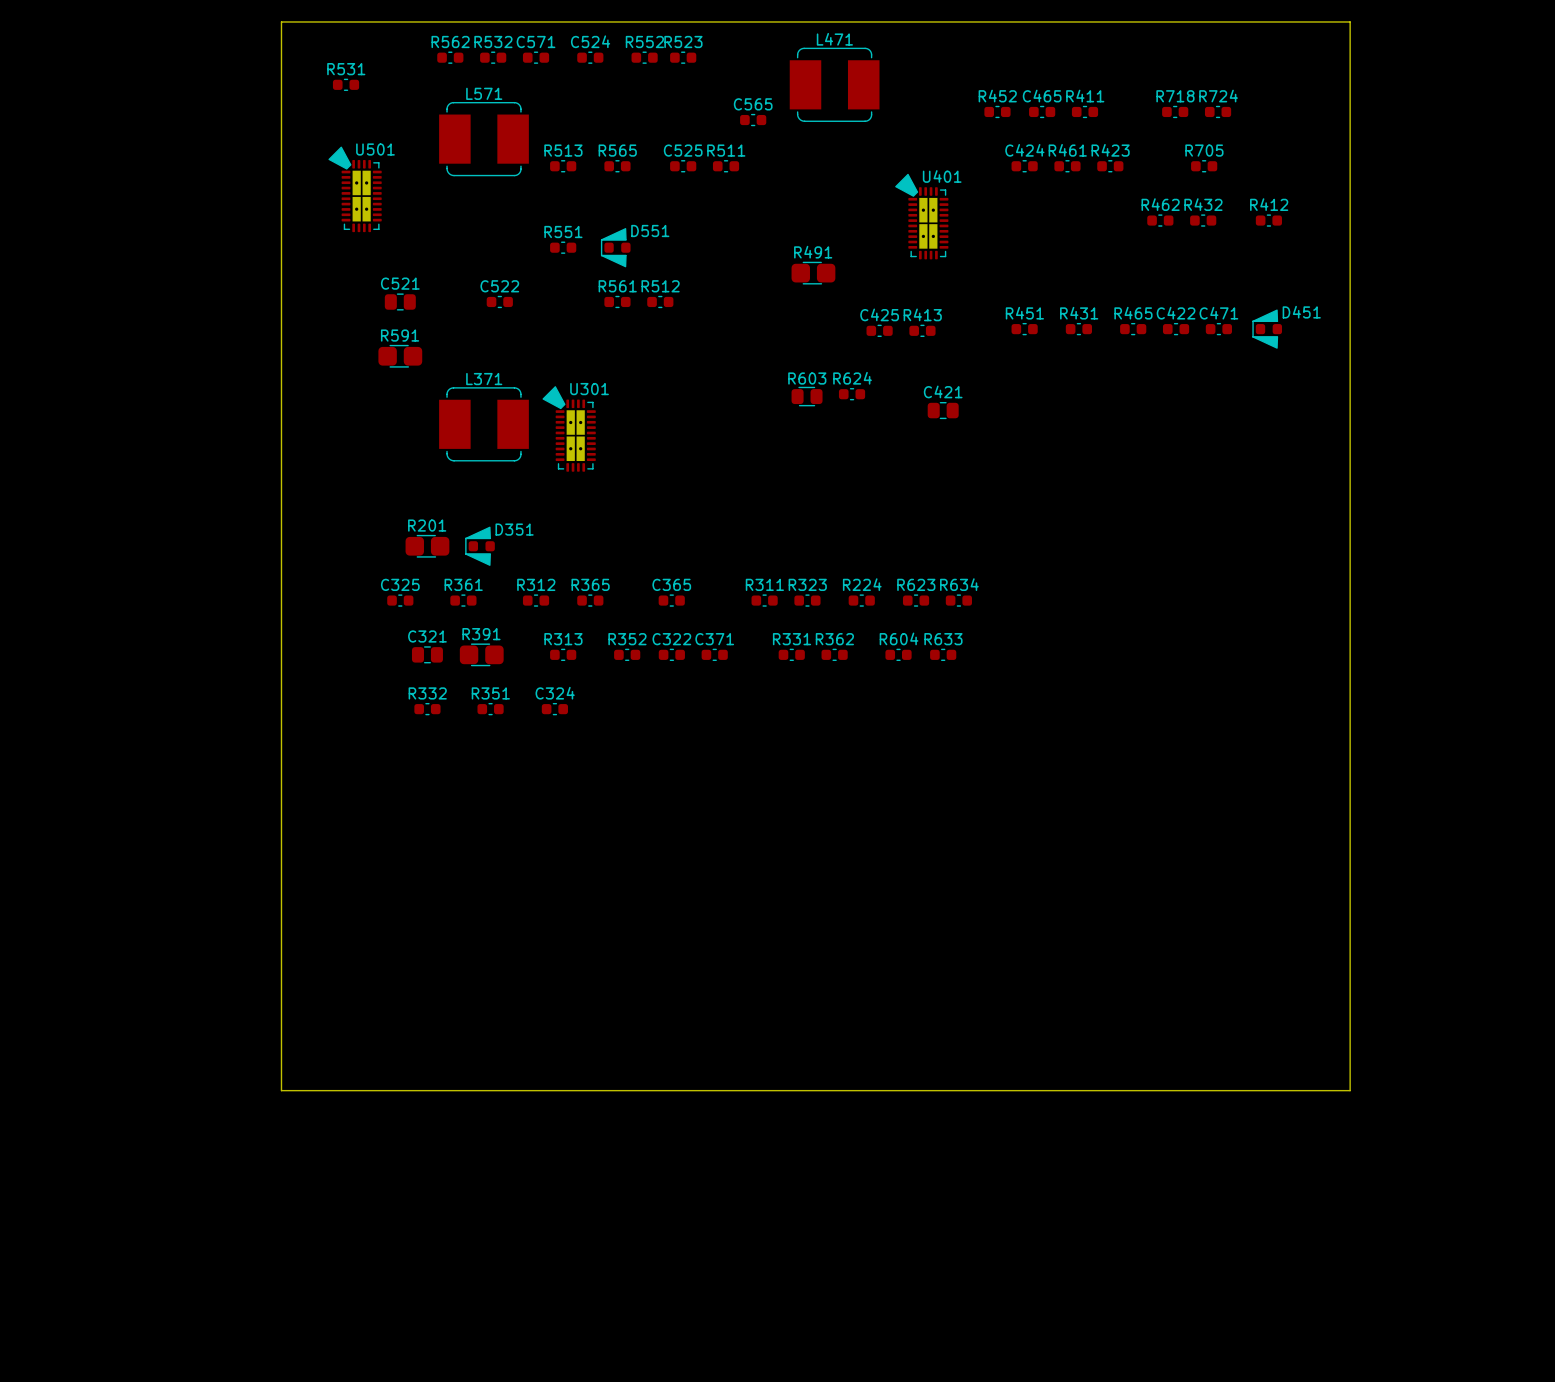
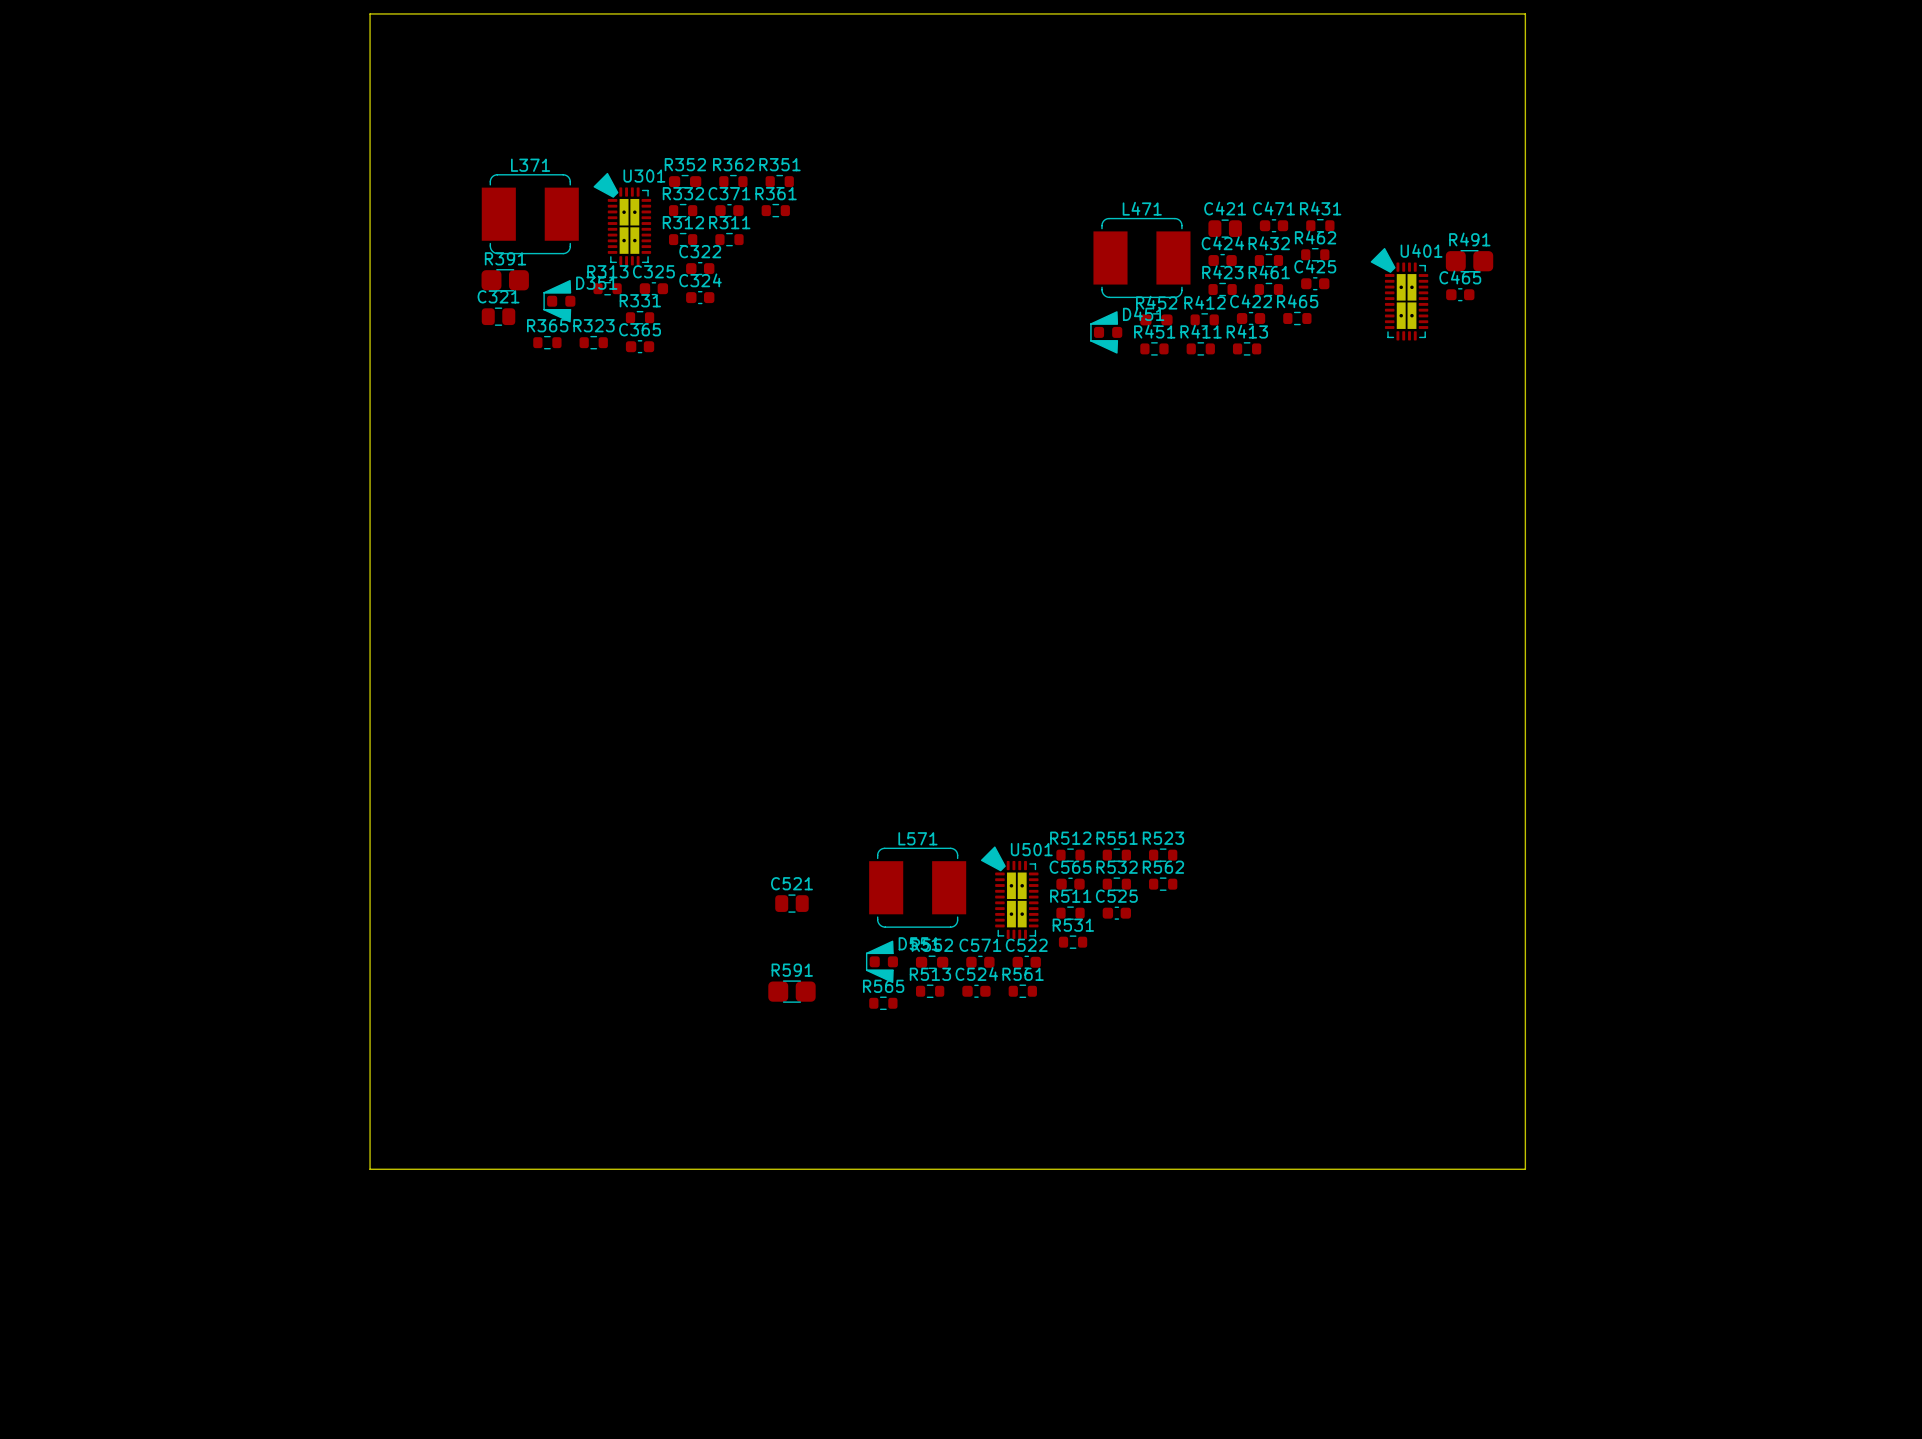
R562 footprint: [437, 51, 464, 64] -> [1149, 877, 1178, 891]
R532 footprint: [480, 51, 507, 64] -> [1102, 877, 1132, 891]
R552 footprint: [631, 51, 658, 64] -> [915, 955, 949, 969]
R523 footprint: [670, 51, 697, 64] -> [1149, 848, 1178, 862]
C571 position: (536, 57) -> (980, 962)
C524 position: (590, 57) -> (976, 991)
R531 footprint: [332, 78, 360, 91] -> [1058, 935, 1088, 949]
L471 position: (834, 84) -> (1141, 257)
R452 footprint: [984, 105, 1011, 119] -> [1140, 313, 1173, 327]
R411 footprint: [1071, 105, 1099, 119] -> [1186, 342, 1215, 356]
C465 position: (1042, 111) -> (1460, 294)
R718: (1175, 111) -> none
R724: (1218, 111) -> none
C565 position: (753, 120) -> (1070, 884)
L571 position: (483, 139) -> (917, 887)
R513 footprint: [550, 160, 577, 173] -> [915, 984, 945, 998]
R565 footprint: [604, 160, 631, 173] -> [869, 996, 898, 1011]
R511 footprint: [712, 160, 740, 173] -> [1056, 906, 1085, 920]
R461 footprint: [1054, 160, 1081, 173] -> [1254, 282, 1284, 297]
R423 footprint: [1097, 160, 1124, 173] -> [1208, 282, 1237, 297]
C525 position: (683, 166) -> (1116, 913)
C424 position: (1024, 166) -> (1222, 260)
R705: (1204, 166) -> none
U501 position: (355, 189) -> (1009, 892)
R462 footprint: [1147, 214, 1174, 227] -> [1301, 248, 1330, 262]
R432 footprint: [1190, 214, 1217, 227] -> [1254, 253, 1284, 268]
R412 footprint: [1255, 214, 1283, 227] -> [1190, 313, 1219, 327]
U401 position: (921, 216) -> (1399, 294)
R551 footprint: [550, 241, 577, 254] -> [1102, 848, 1132, 862]
D551 position: (615, 247) -> (881, 961)
R491 footprint: [791, 261, 836, 285] -> [1445, 250, 1494, 273]
C521 name: C521 (400, 283) -> C321 (498, 296)
R561 footprint: [604, 295, 631, 309] -> [1008, 984, 1037, 998]
R512 footprint: [647, 295, 674, 309] -> [1056, 848, 1085, 862]
C522 position: (499, 301) -> (1026, 962)
R451 footprint: [1011, 323, 1038, 336] -> [1140, 342, 1169, 356]
R431 footprint: [1065, 323, 1093, 336] -> [1306, 219, 1335, 233]
R465 footprint: [1120, 323, 1147, 336] -> [1283, 311, 1312, 326]
R413 footprint: [909, 324, 936, 337] -> [1232, 342, 1262, 356]
C422 position: (1176, 329) -> (1251, 318)
C471 position: (1218, 329) -> (1274, 225)
D451 position: (1267, 329) -> (1106, 332)
C425 position: (879, 330) -> (1315, 283)
R591 footprint: [378, 344, 423, 368] -> [768, 980, 816, 1003]
R624: (852, 394) -> none
R603: (807, 396) -> none
C421 position: (943, 410) -> (1225, 228)
L371 position: (483, 424) -> (530, 214)
U301 position: (569, 428) -> (622, 219)
R201: (427, 546) -> none
D351 position: (480, 546) -> (559, 301)
R361 footprint: [450, 594, 477, 607] -> [761, 203, 790, 218]
R312 footprint: [522, 594, 550, 607] -> [668, 232, 698, 247]
R365 footprint: [577, 594, 604, 607] -> [533, 335, 562, 350]
R311 footprint: [751, 594, 778, 607] -> [715, 232, 744, 247]
R323 footprint: [794, 594, 821, 607] -> [579, 335, 608, 350]
C325 position: (400, 600) -> (653, 288)
C365 position: (671, 600) -> (640, 346)
R224: (861, 600) -> none
R623: (916, 600) -> none
R634: (958, 600) -> none
R391 footprint: [459, 643, 504, 667] -> [481, 269, 529, 292]
R313 footprint: [550, 648, 577, 661] -> [593, 281, 622, 296]
R352 footprint: [614, 648, 641, 661] -> [668, 174, 702, 189]
R331 footprint: [778, 648, 805, 661] -> [625, 310, 655, 325]
R362 footprint: [821, 648, 848, 661] -> [719, 174, 748, 189]
C321: (427, 654) -> none
C322 position: (671, 654) -> (700, 268)
C371 position: (714, 654) -> (729, 210)
R604: (898, 654) -> none
R633: (943, 654) -> none
R332 footprint: [414, 703, 441, 716] -> [668, 203, 698, 218]
R351 footprint: [477, 703, 504, 716] -> [765, 174, 794, 189]
C324 position: (554, 709) -> (700, 297)
C521: none -> (791, 903)

